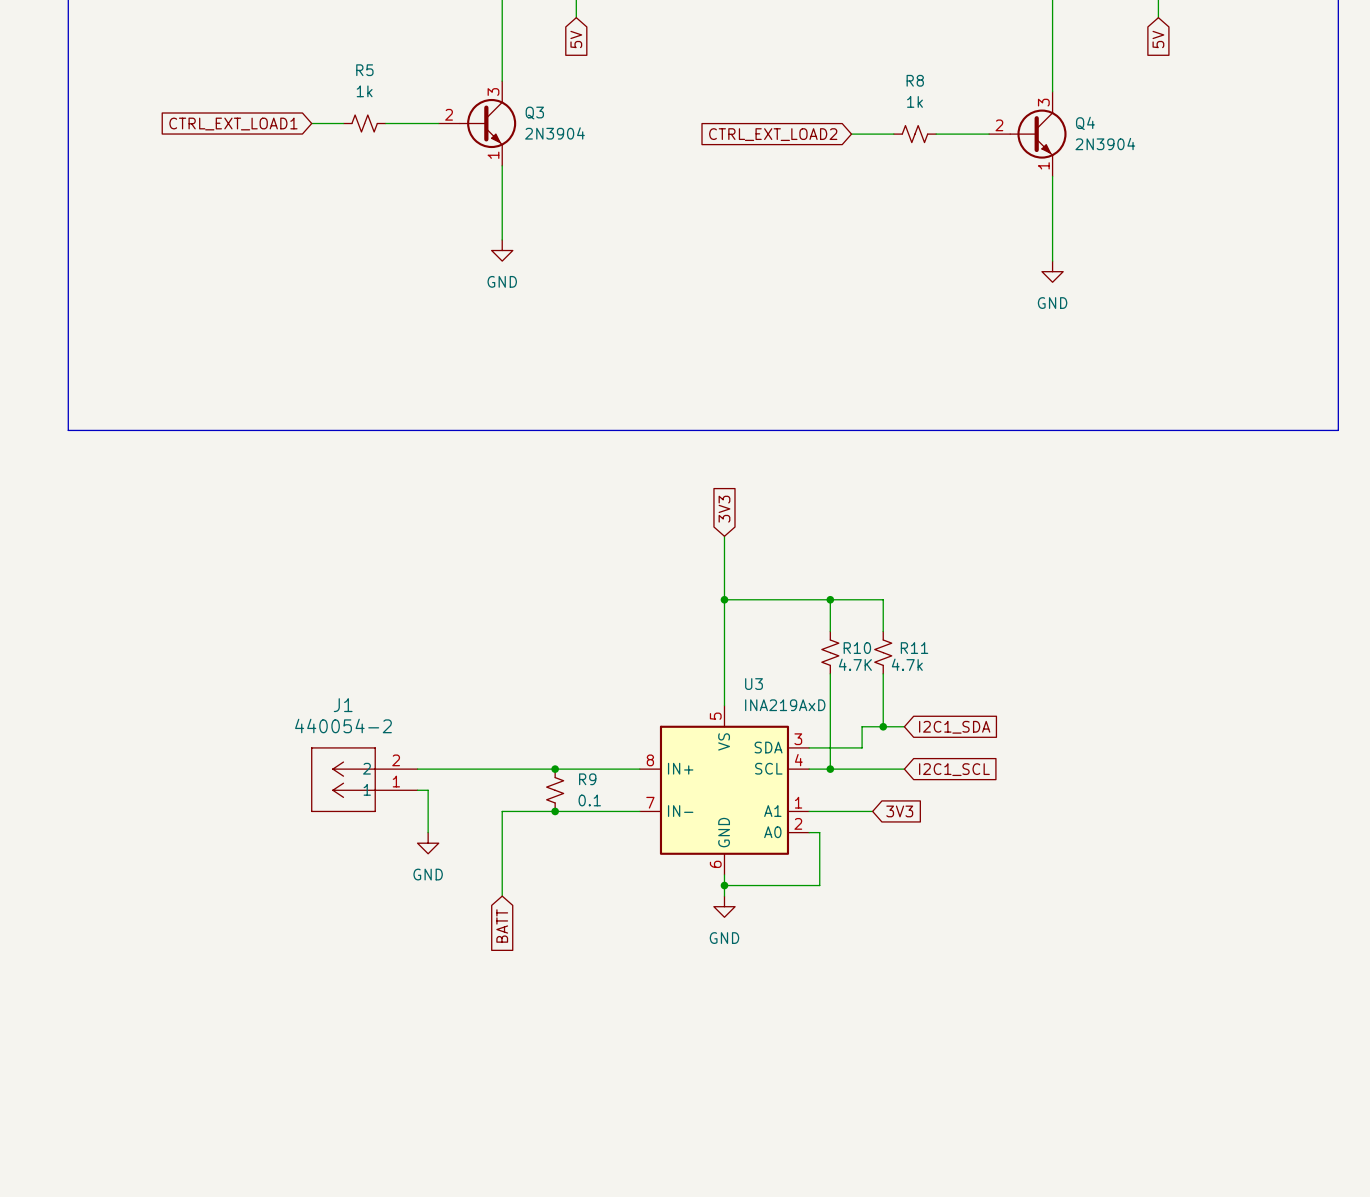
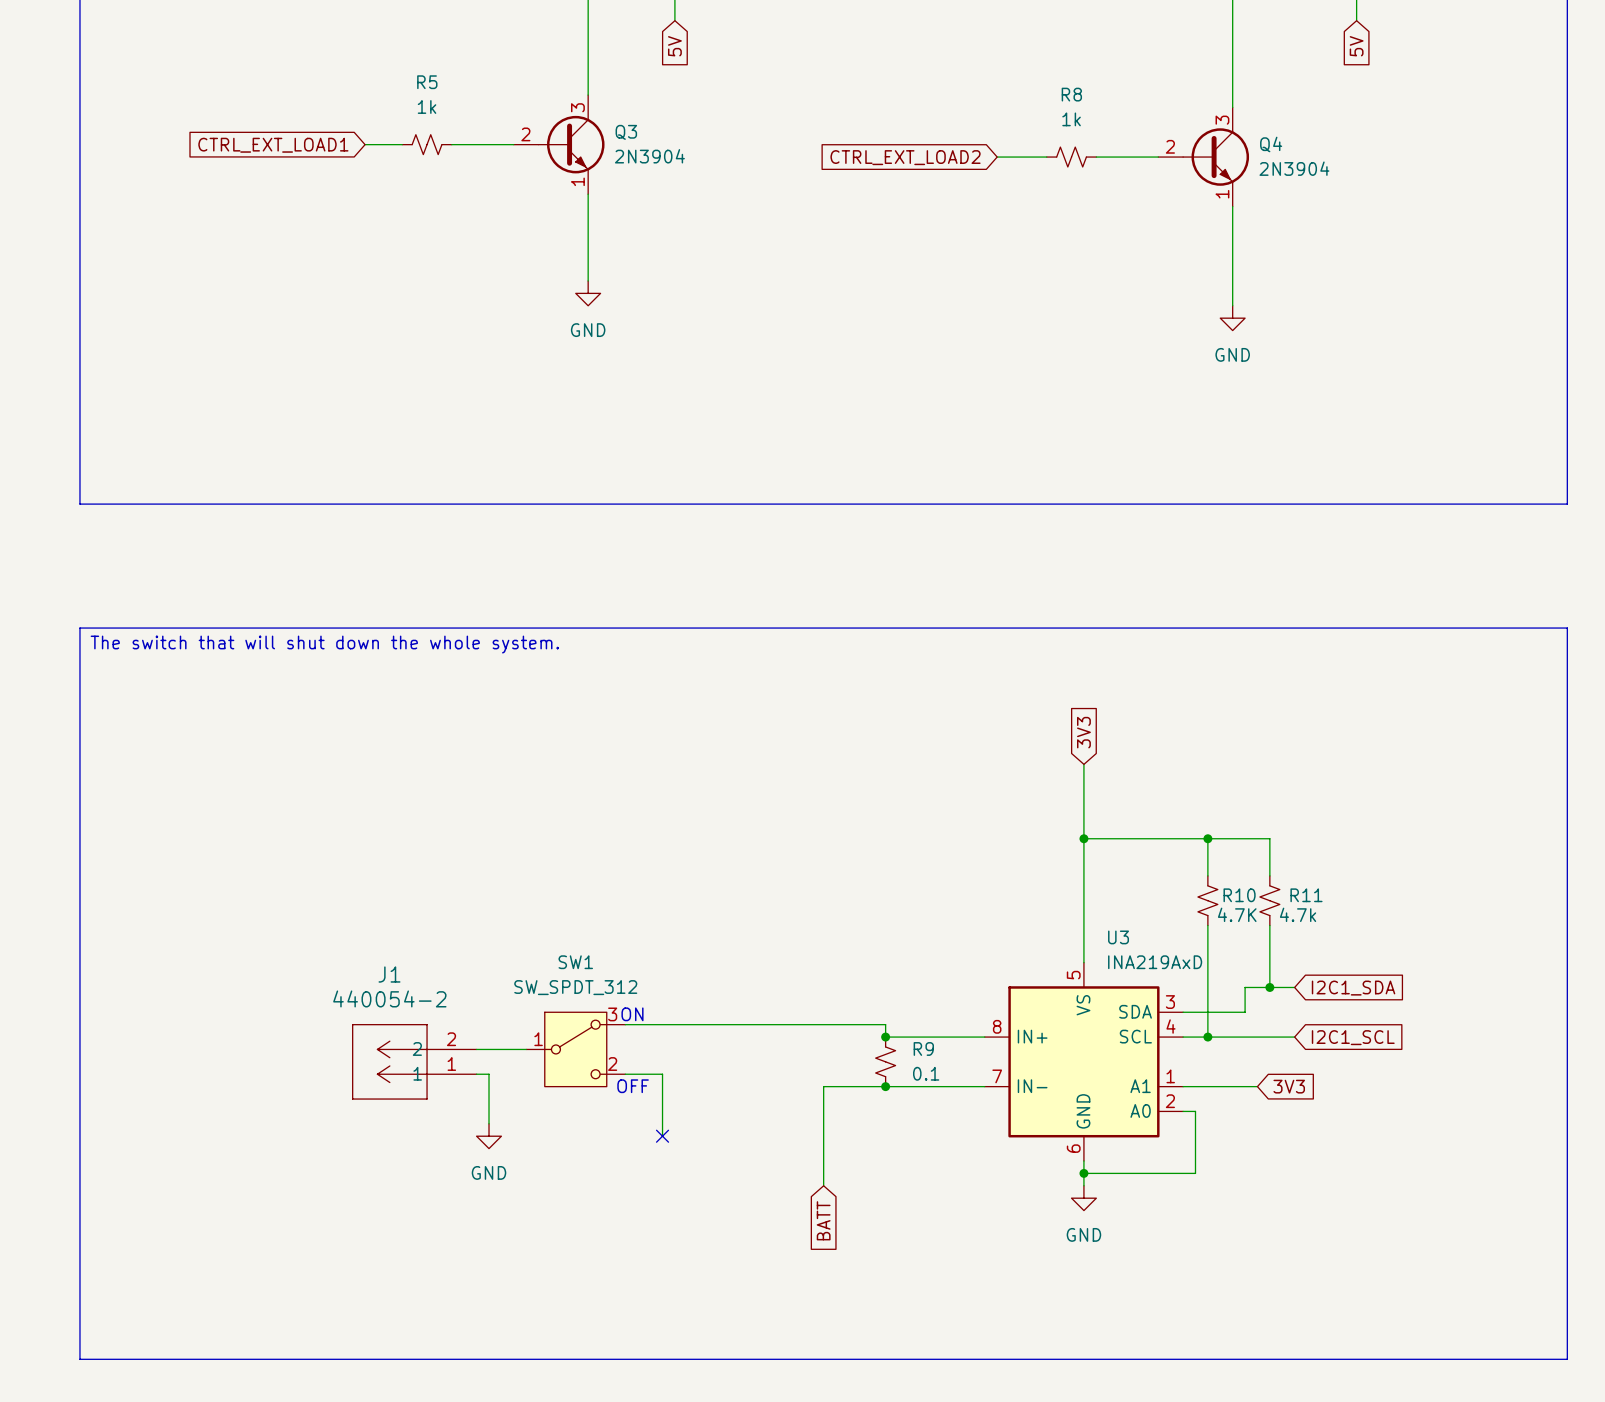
global label: 3V3 (724, 509) -> none
line: none -> (79, 628) (79, 1359) (1567, 1359) (1567, 628) (79, 628)
wire: (724, 536) (724, 705) -> none
text: none -> The switch that will shut down the whole system. (324, 644)
wire: (724, 599) (883, 599) (883, 631) -> none
junction: (724, 599) -> none
wire: (830, 599) (830, 631) -> none
junction: (830, 599) -> none
global label: none -> 3V3 (1083, 732)
R10 position: (830, 652) -> (1207, 900)
R11 position: (883, 652) -> (1269, 900)
wire: none -> (1083, 764) (1083, 962)
wire: (830, 673) (830, 769) -> none
wire: (883, 673) (883, 726) -> none
wire: none -> (1083, 838) (1269, 838) (1269, 875)
wire: none -> (1207, 838) (1207, 875)
junction: none -> (1207, 838)
junction position: (883, 726) -> (1083, 838)
wire: (904, 726) (862, 726) (862, 747) (809, 747) -> none
global label: I2C1_SDA (954, 727) -> none
wire: (417, 769) (639, 769) -> none
junction: (555, 769) -> none
wire: (809, 769) (904, 769) -> none
junction: (830, 769) -> none
global label: I2C1_SCL (954, 769) -> none
J1 position: (364, 779) -> (414, 1061)
wire: (417, 790) (428, 790) (428, 832) -> (476, 1074) (489, 1074) (489, 1123)
R9 position: (555, 790) -> (885, 1061)
U3 position: (724, 790) -> (1083, 1061)
wire: none -> (1207, 925) (1207, 1037)
wire: none -> (1269, 925) (1269, 987)
junction: (555, 811) -> none
wire: (639, 811) (502, 811) (502, 896) -> none
wire: (809, 811) (872, 811) -> none
global label: 3V3 (899, 811) -> none
wire: (809, 832) (819, 832) (819, 885) -> (984, 1037) (960, 1037)
power symbol position: GND (428, 843) -> GND (489, 1136)
junction: none -> (1269, 987)
wire: none -> (1294, 987) (1245, 987) (1245, 1012) (1183, 1012)
global label: none -> I2C1_SDA (1353, 988)
text: none -> ON (632, 1014)
wire: (724, 874) (724, 896) -> none
wire: (724, 885) (756, 885) -> (625, 1024) (885, 1024) (885, 1037)
junction: (724, 885) -> none
junction: none -> (885, 1037)
wire: none -> (1183, 1037) (1294, 1037)
junction: none -> (1207, 1037)
global label: none -> I2C1_SCL (1353, 1037)
wire: none -> (476, 1049) (526, 1049)
SW1: none -> SW_SPDT_312 (575, 1049)
power symbol: GND (724, 906) -> none
wire: none -> (625, 1074) (662, 1074) (662, 1136)
global label: BATT (502, 925) -> none
text: none -> OFF (633, 1086)
junction: none -> (885, 1086)
wire: none -> (984, 1086) (823, 1086) (823, 1185)
wire: none -> (1183, 1086) (1257, 1086)
global label: none -> 3V3 (1289, 1086)
wire: none -> (1183, 1111) (1195, 1111) (1195, 1173) (1083, 1173)
no-connect mark: none -> (662, 1136)
wire: none -> (1083, 1161) (1083, 1185)
junction: none -> (1083, 1173)
power symbol: none -> GND (1083, 1198)
global label: none -> BATT (823, 1220)

